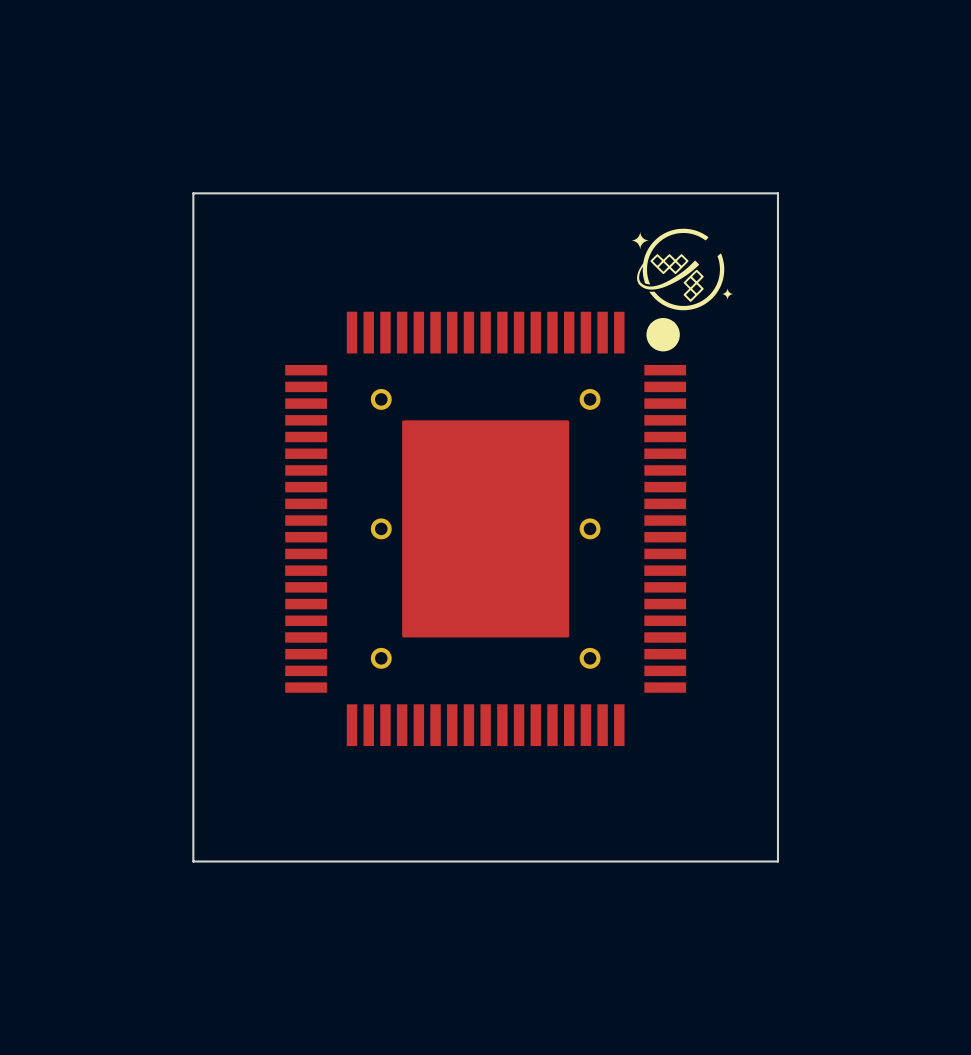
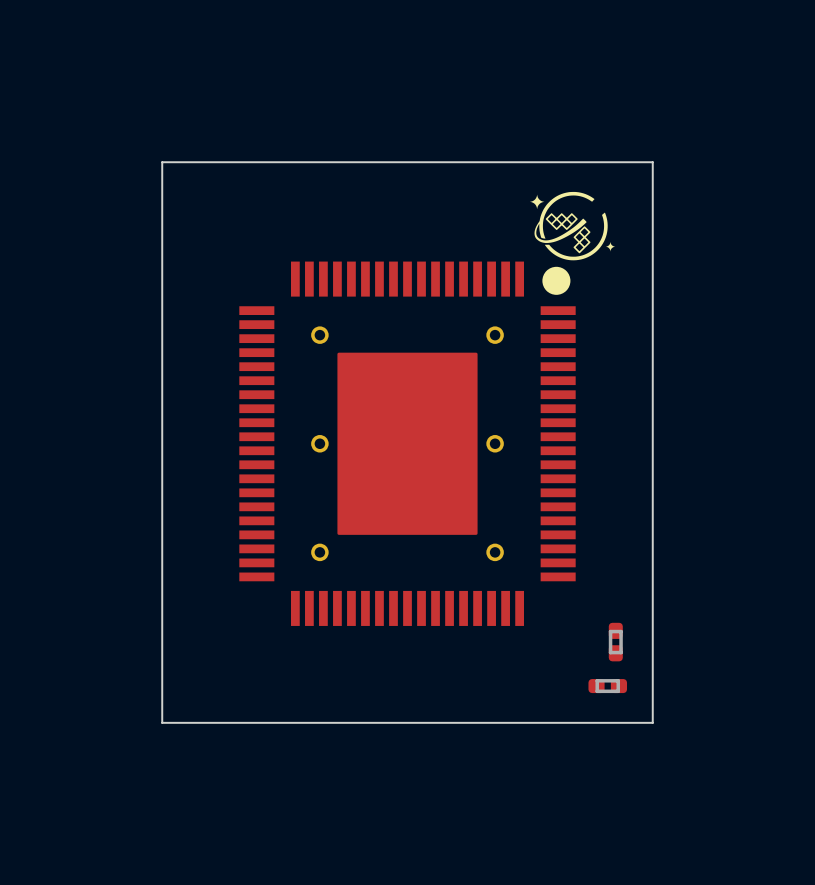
part: none -> (615, 642)
part: none -> (607, 686)

